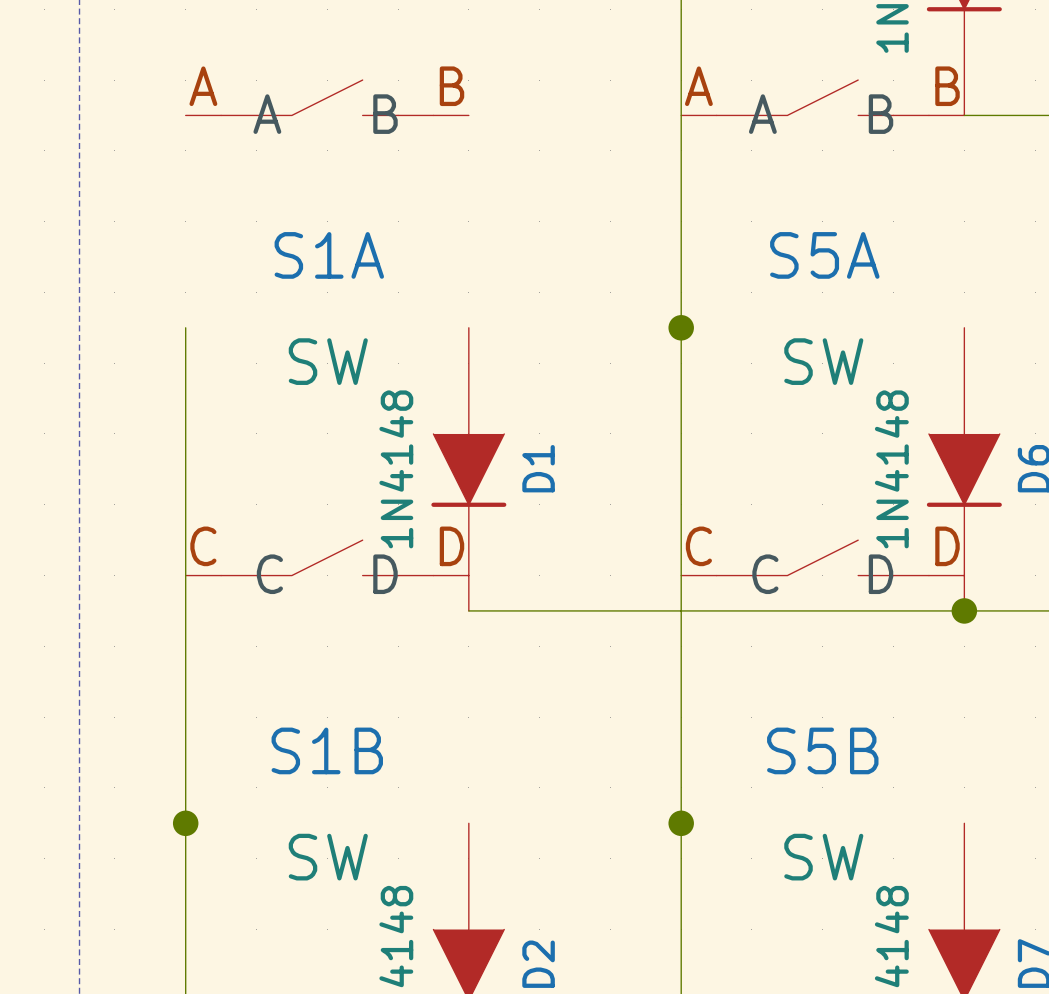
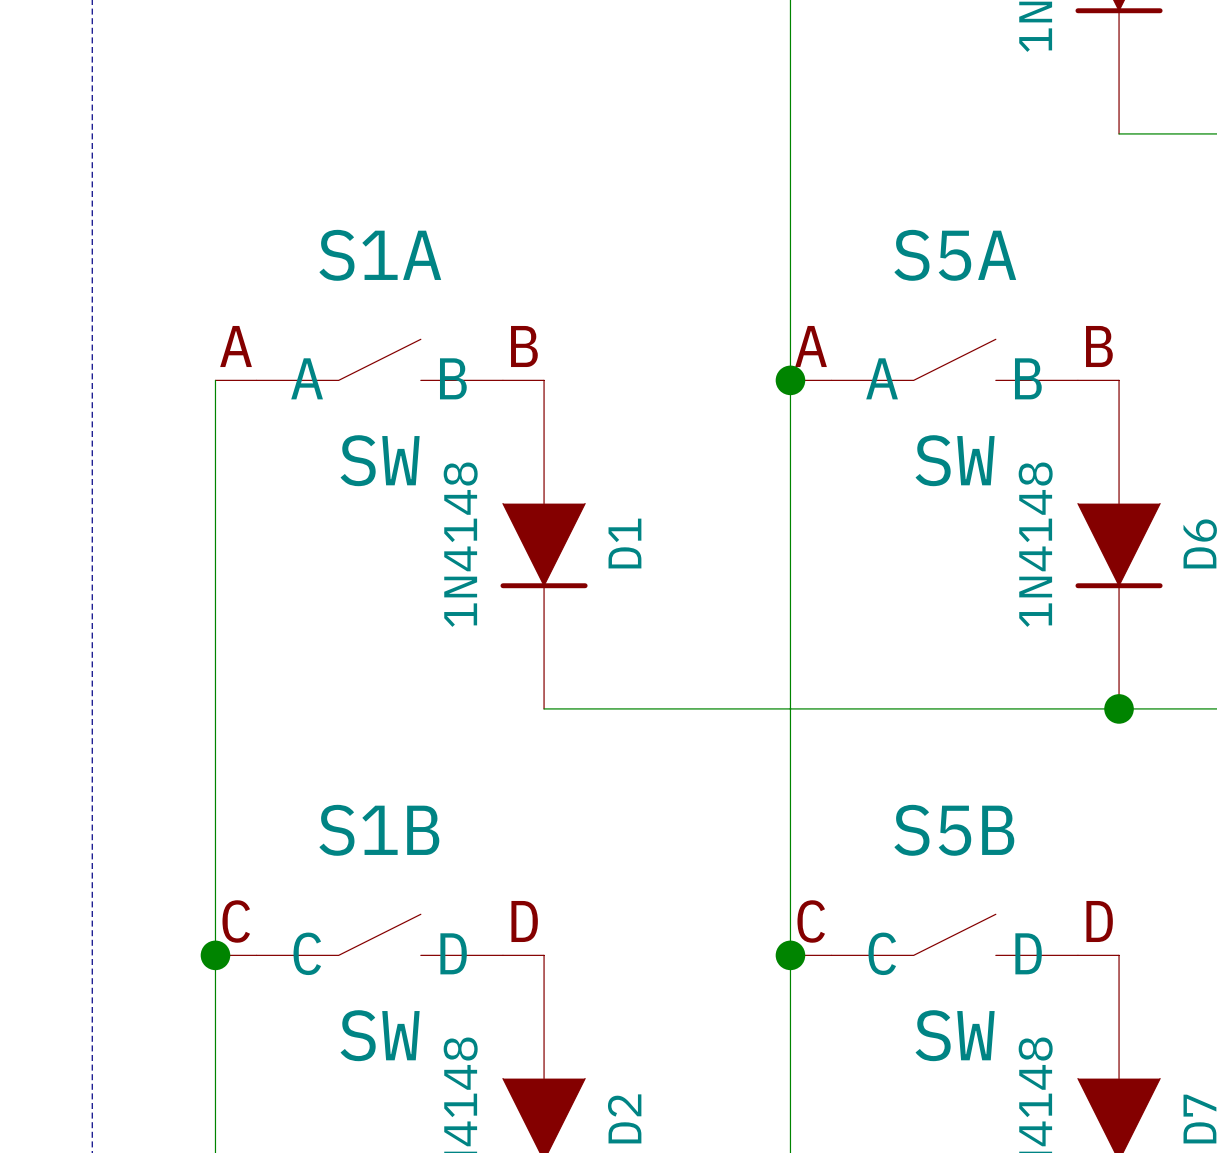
S1A position: (327, 97) -> (379, 359)
S5A position: (822, 97) -> (954, 359)
S1A name position: S1A (329, 255) -> S1A (380, 255)
S5A name position: S5A (824, 255) -> S5A (955, 255)
S1A value position: SW (328, 361) -> SW (380, 460)
S5A value position: SW (823, 361) -> SW (955, 460)
S1B position: (327, 557) -> (379, 934)
S5B position: (822, 557) -> (954, 934)
S1B name position: S1B (327, 750) -> S1B (379, 830)
S5B name position: S5B (822, 750) -> S5B (954, 830)
S1B value position: SW (328, 857) -> SW (380, 1035)
S5B value position: SW (823, 857) -> SW (955, 1035)

